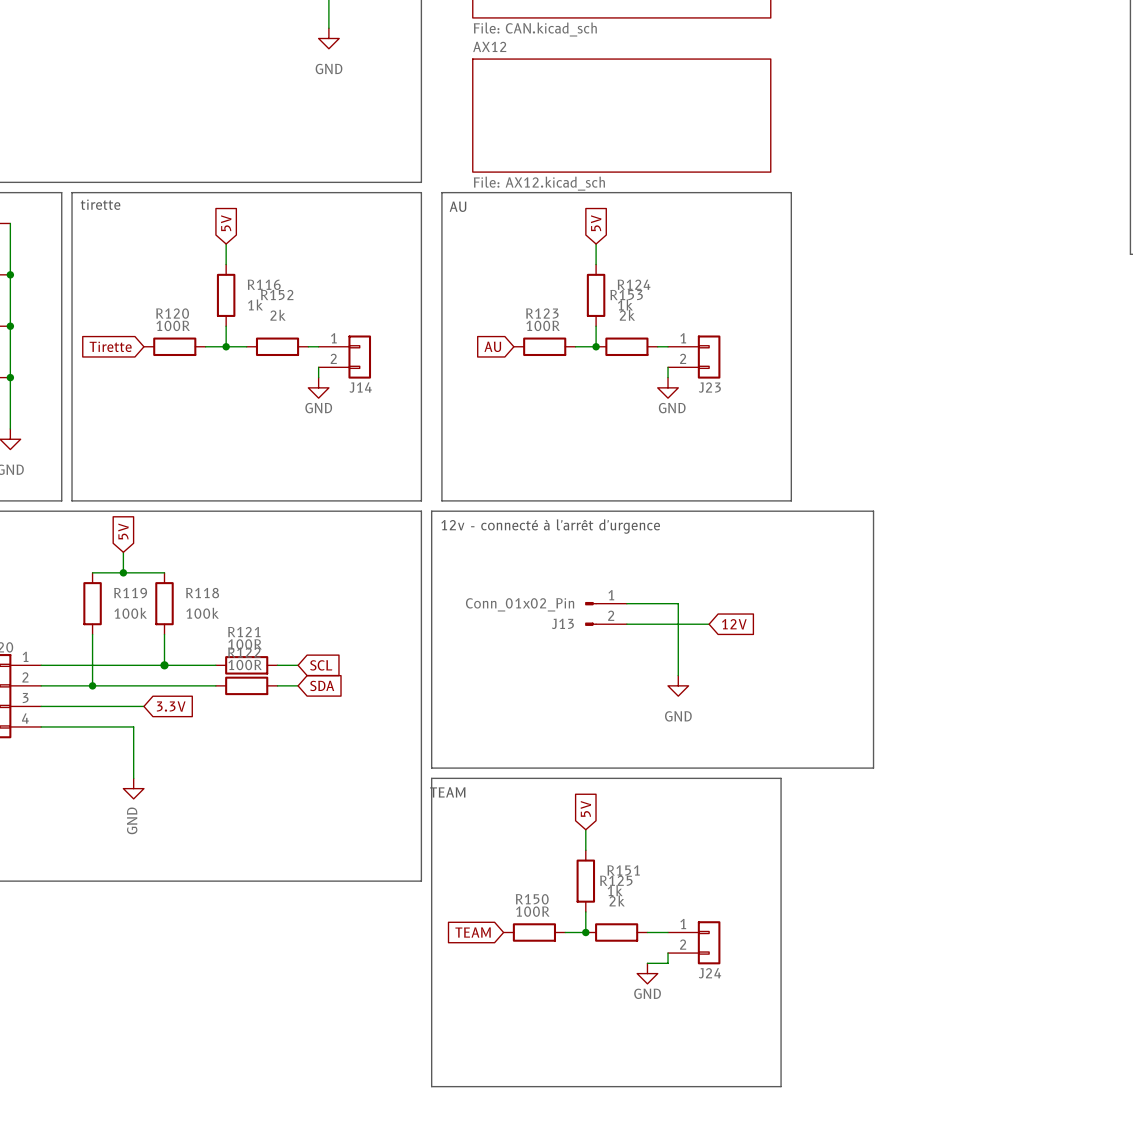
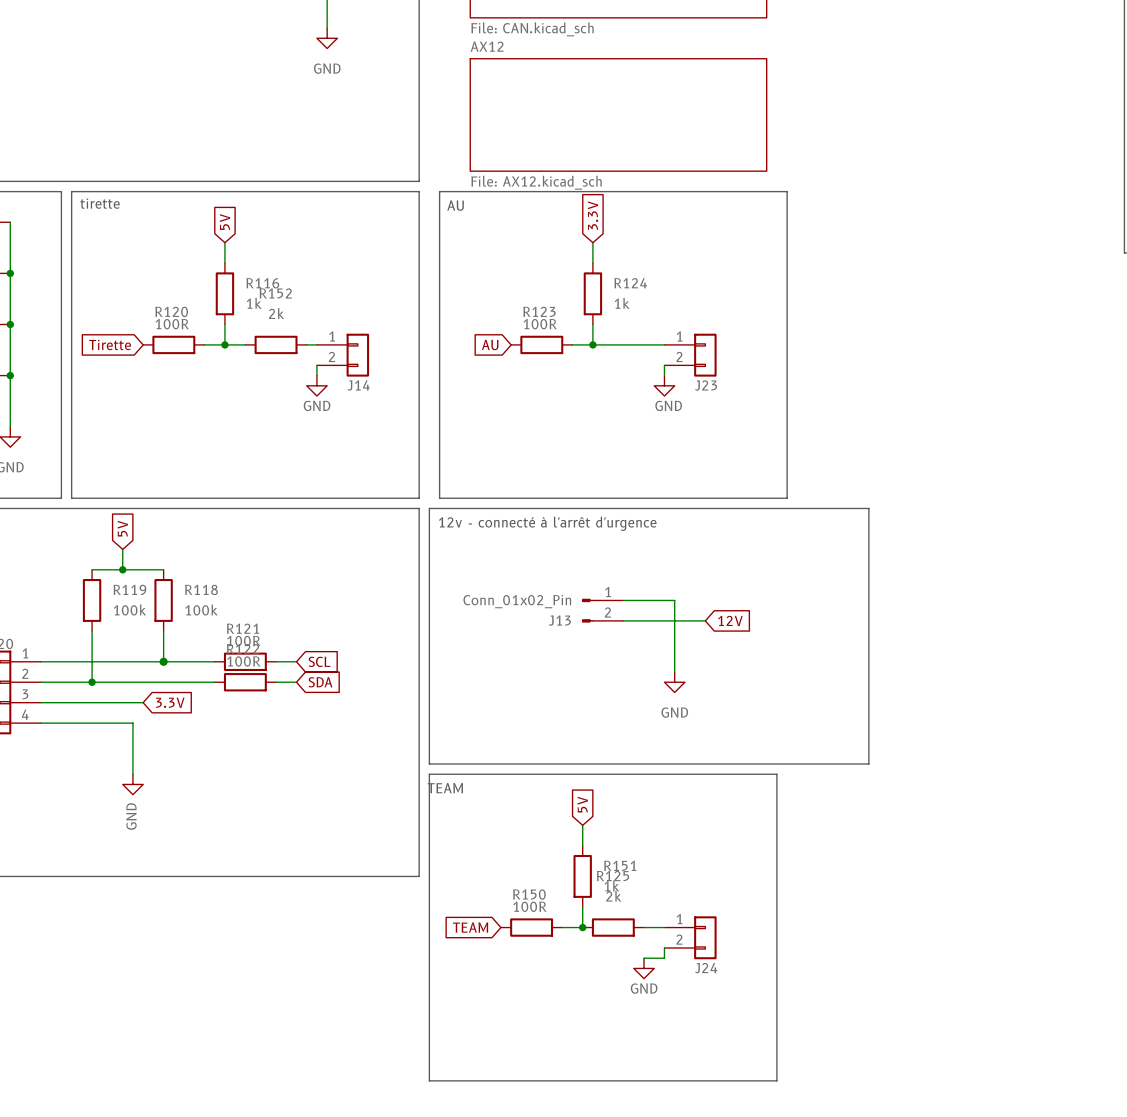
global label: 5V (596, 223) -> 3.3V (592, 215)
wire: none -> (592, 344) (654, 344)
R153: 2k (626, 346) -> none

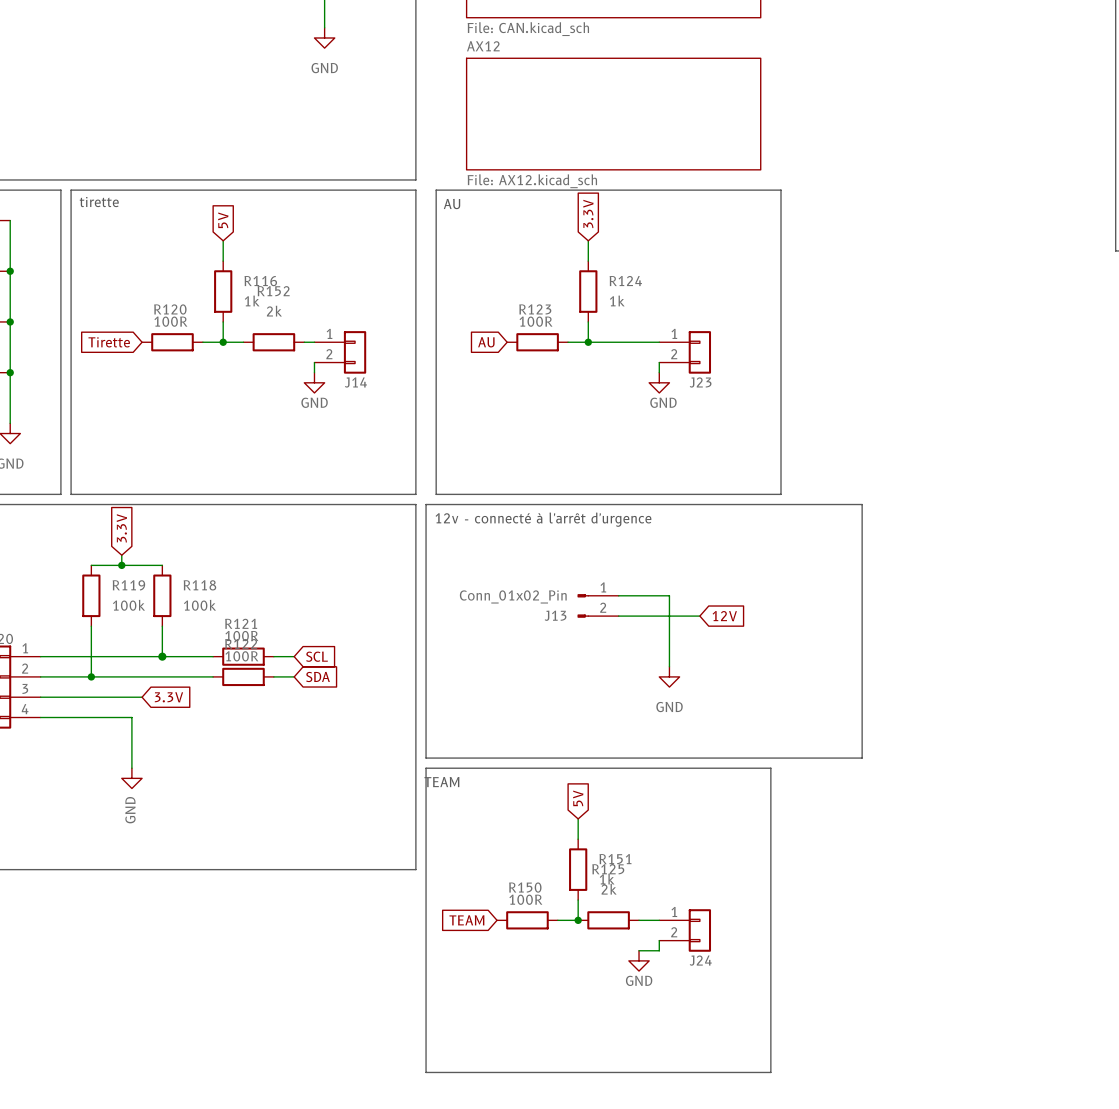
global label: 5V (122, 528) -> none
global label: none -> 3.3V (121, 528)
wire: (122, 549) (122, 559) -> none

